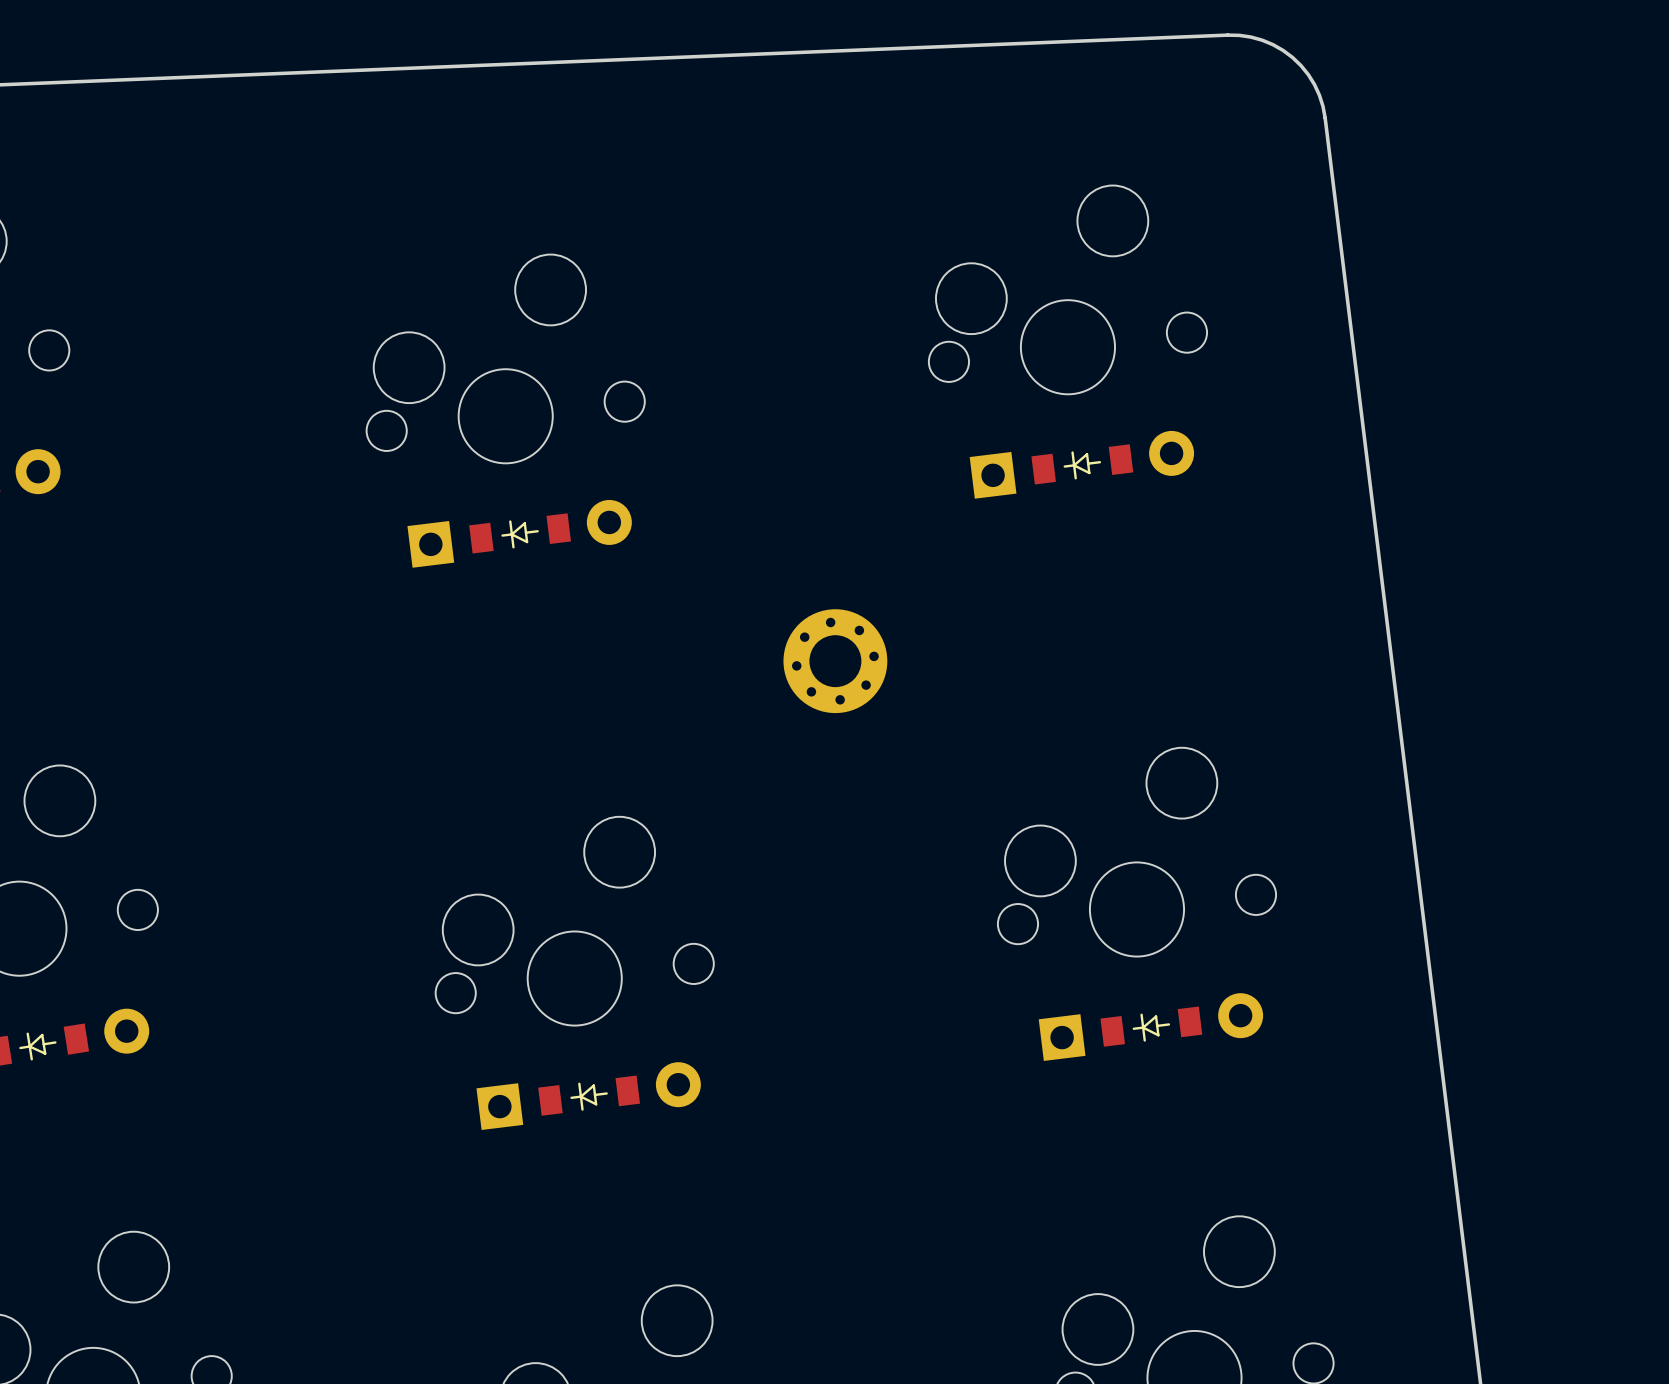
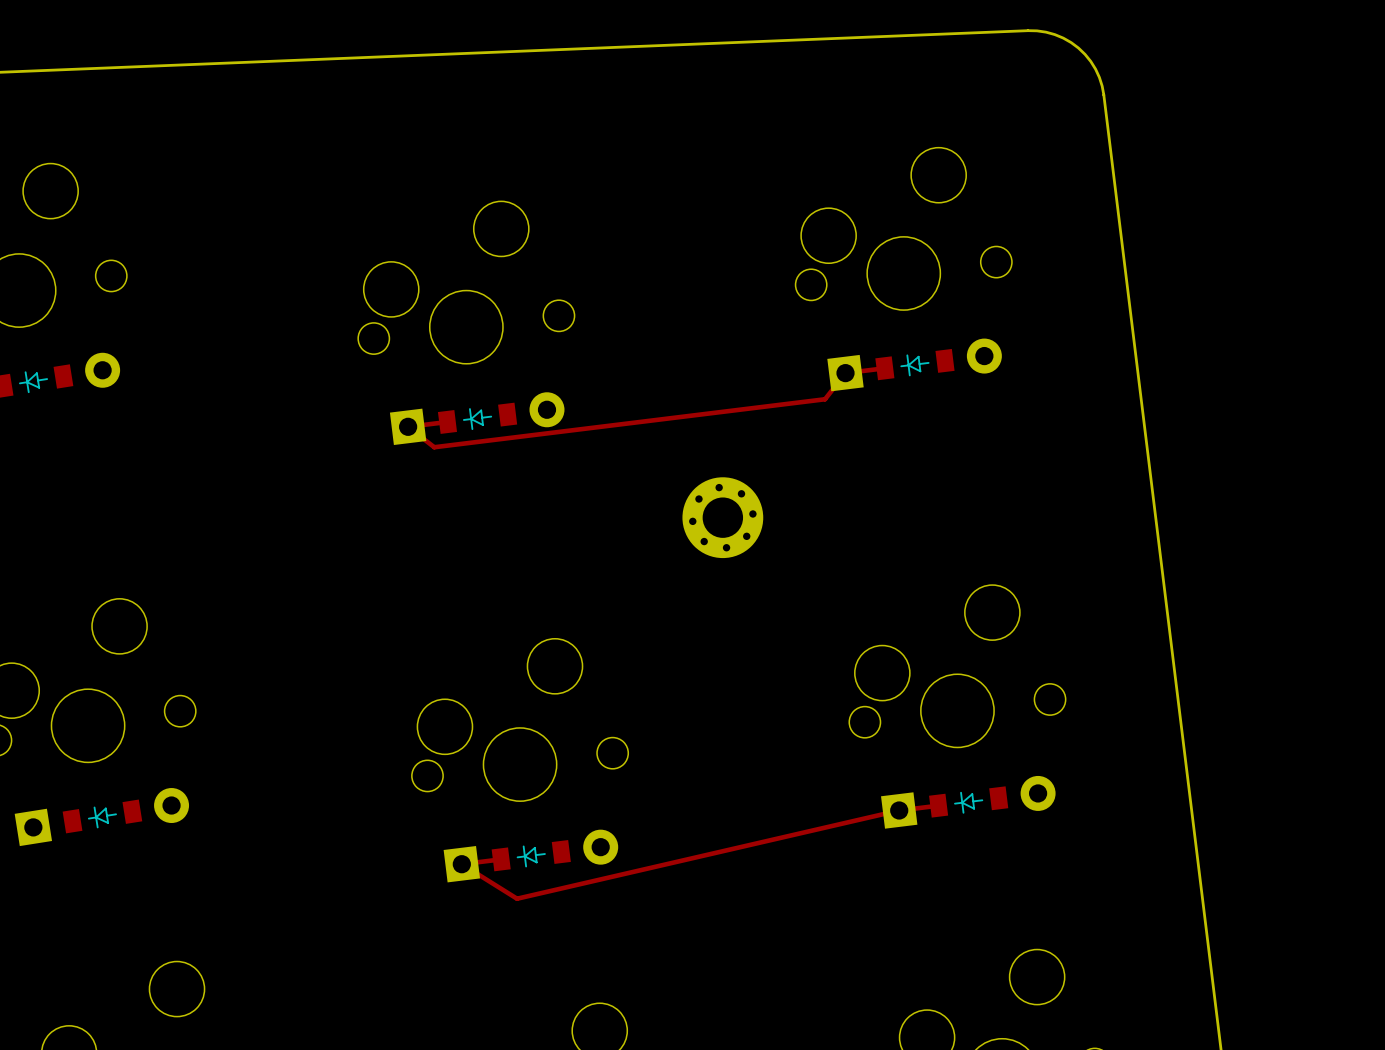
track: none -> (884, 368) (845, 373) (825, 399) (434, 447) (408, 426) (447, 421)
track: none -> (938, 805) (899, 810) (517, 898) (461, 864) (501, 859)

